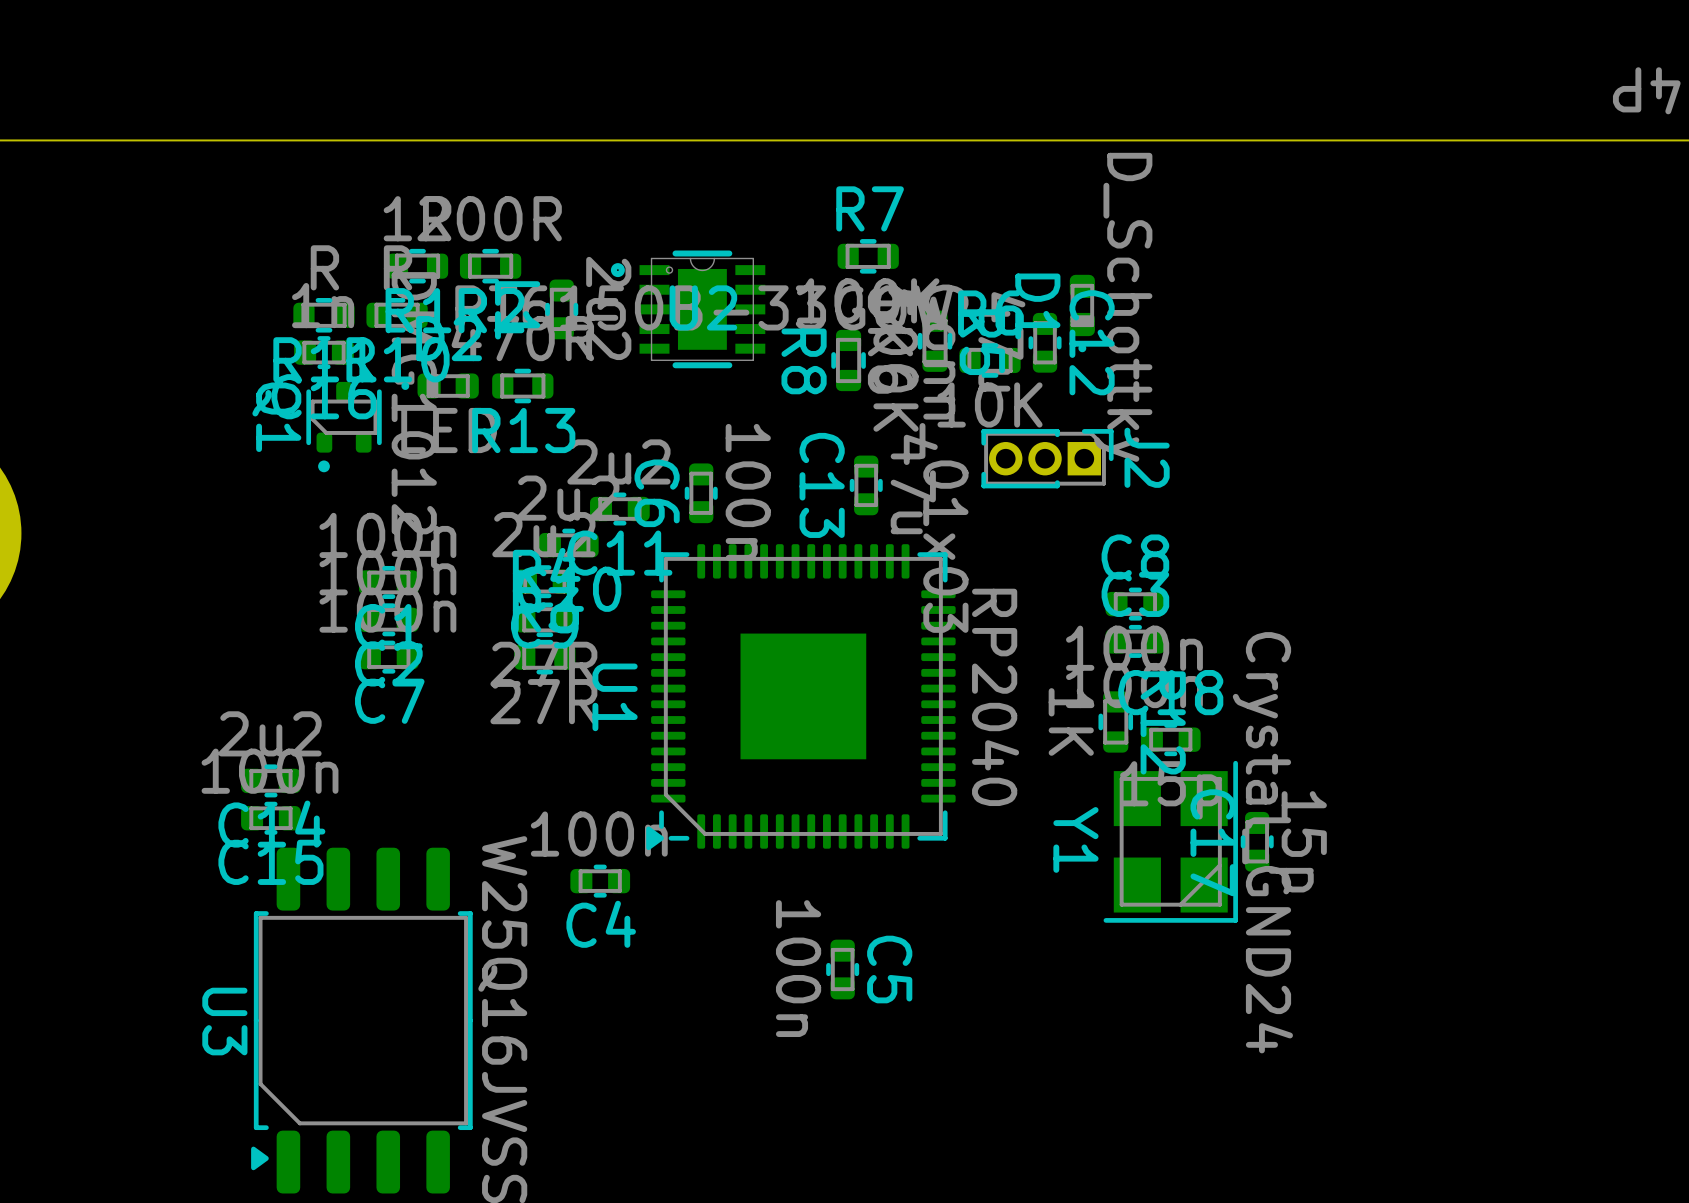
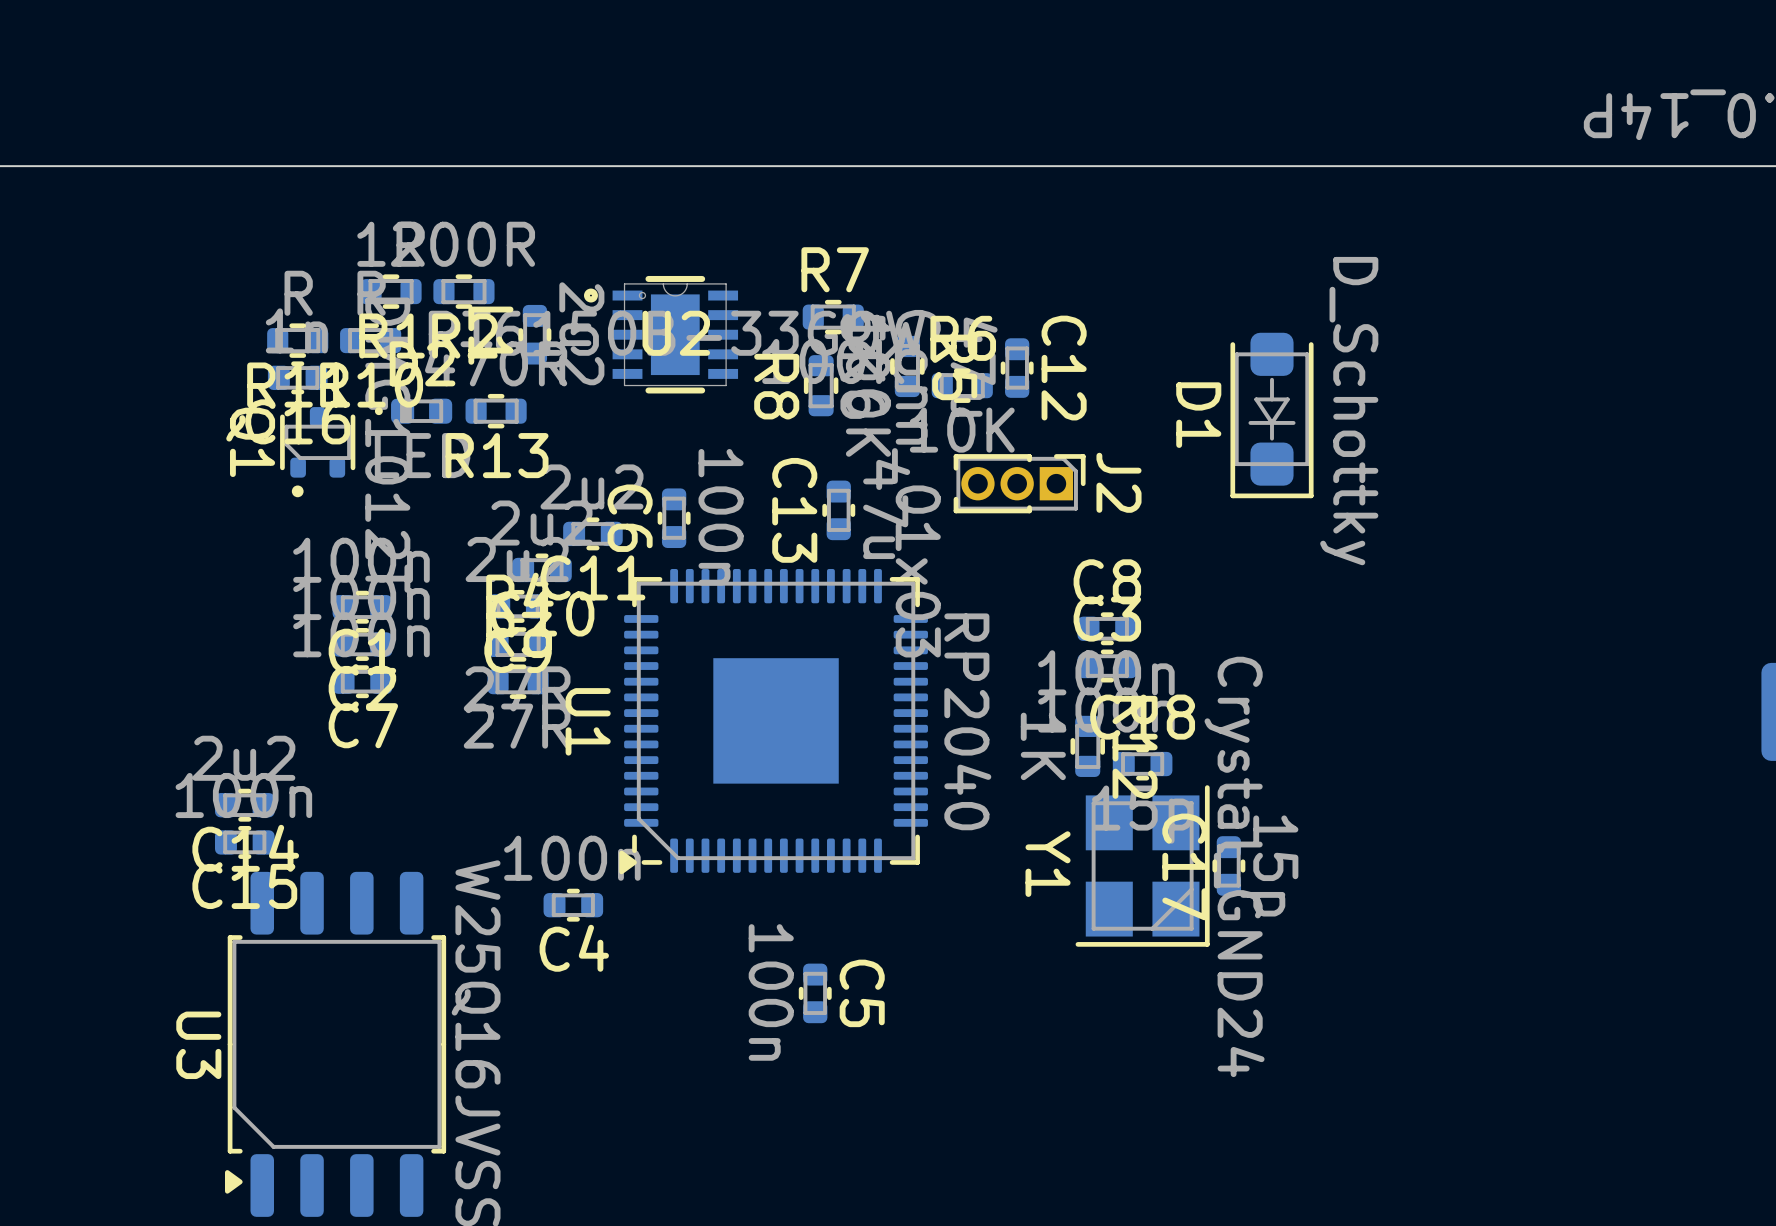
R7 position: (868, 256) -> (833, 317)
D1 footprint: [1069, 274, 1095, 353] -> [1230, 332, 1314, 499]

